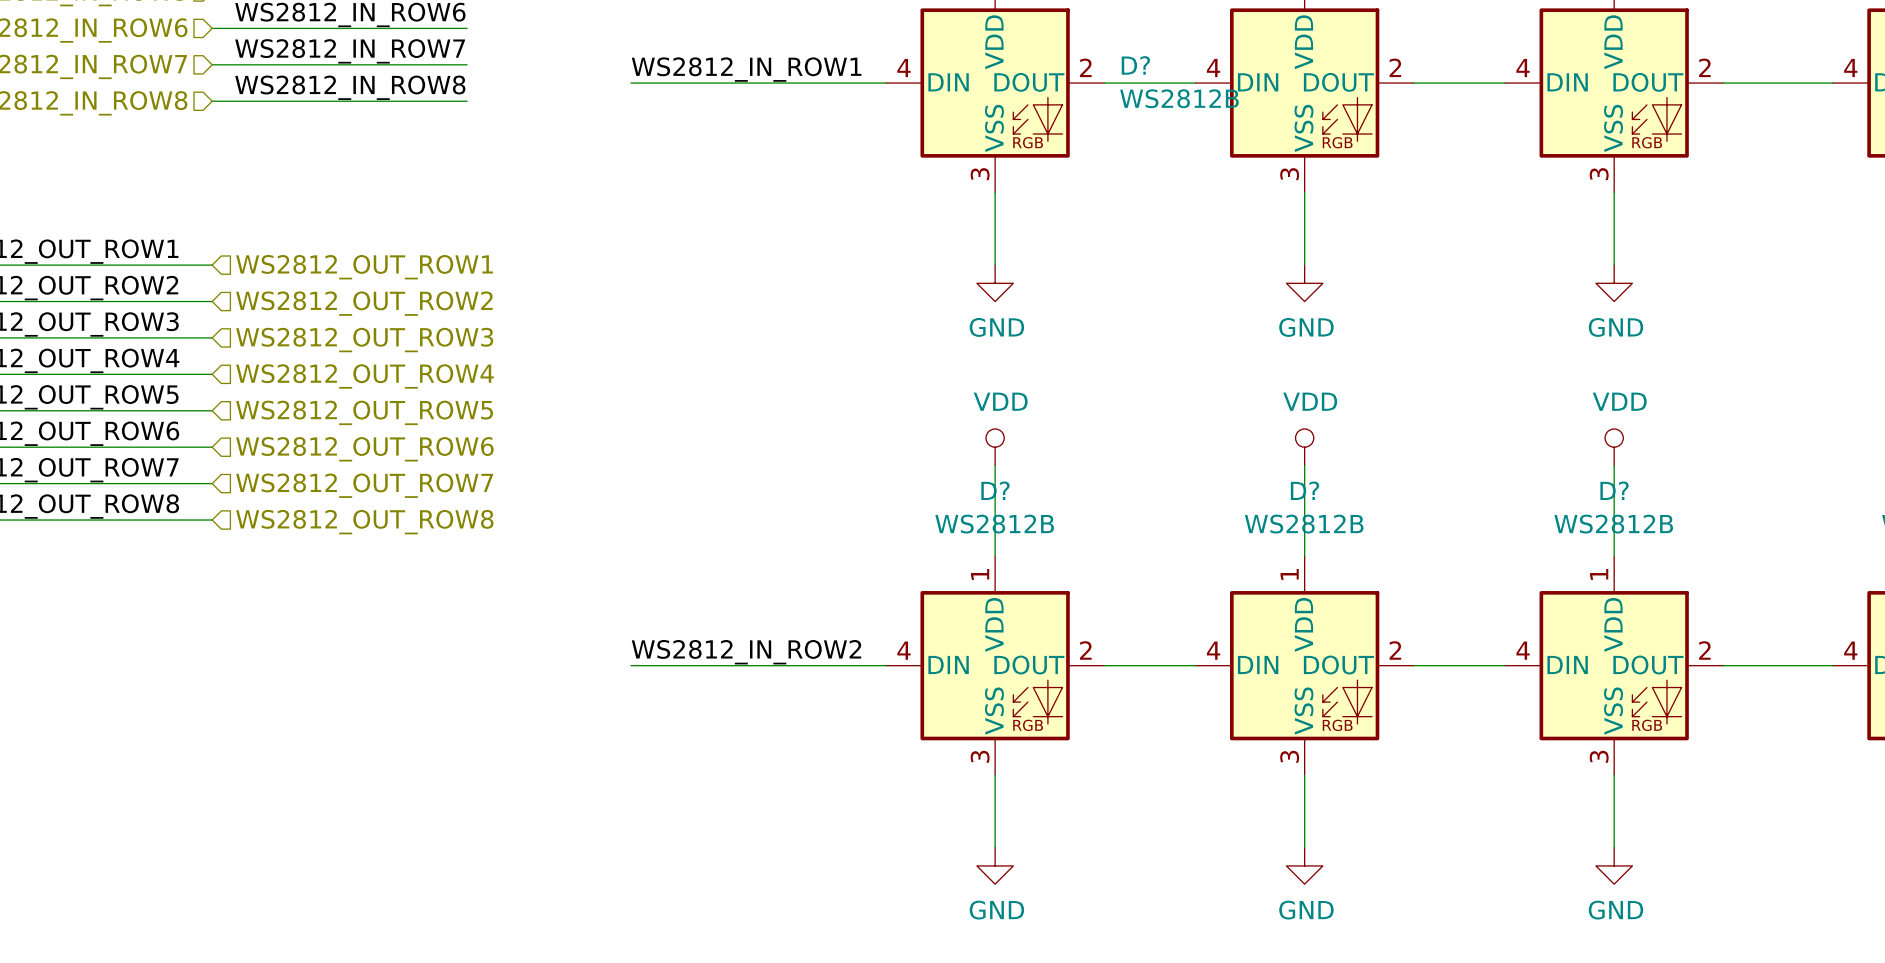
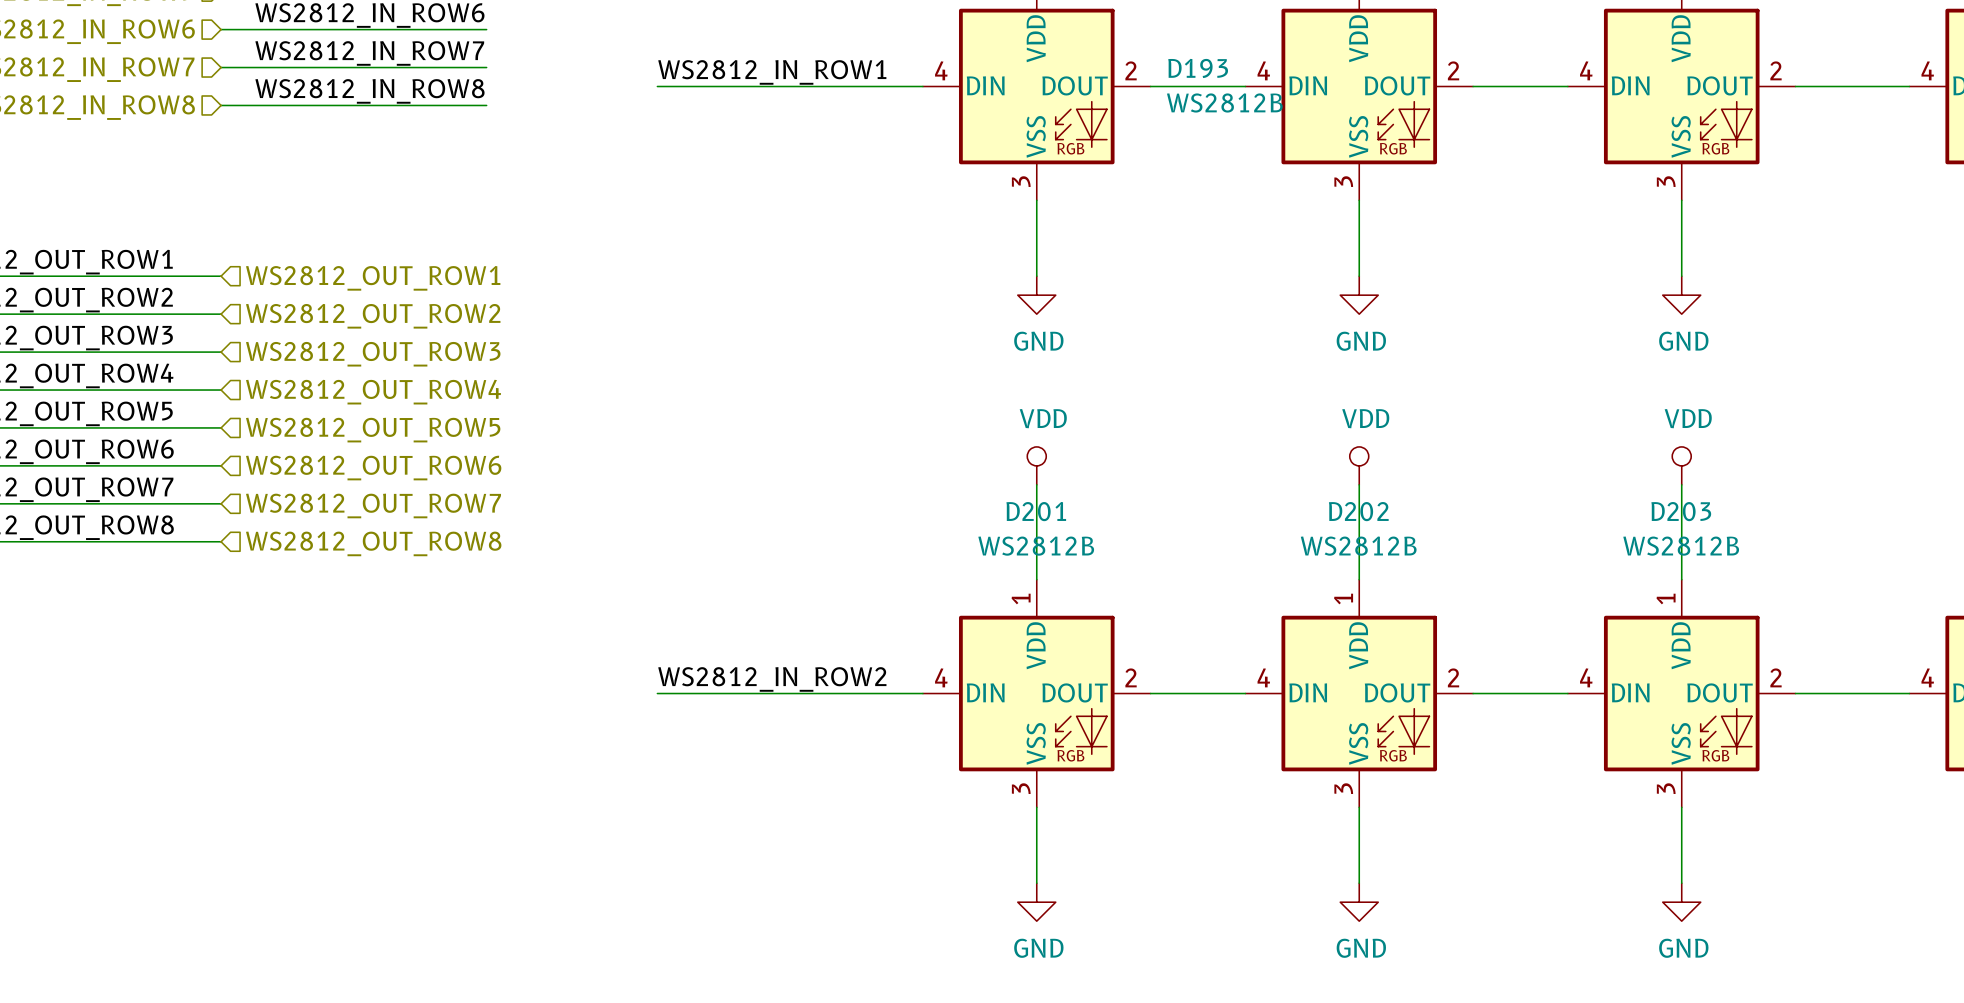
D? name: D? (1135, 65) -> D193 (1198, 68)
D? name: D? (995, 490) -> D201 (1036, 511)
D? name: D? (1305, 490) -> D202 (1358, 511)
D? name: D? (1614, 490) -> D203 (1681, 511)

